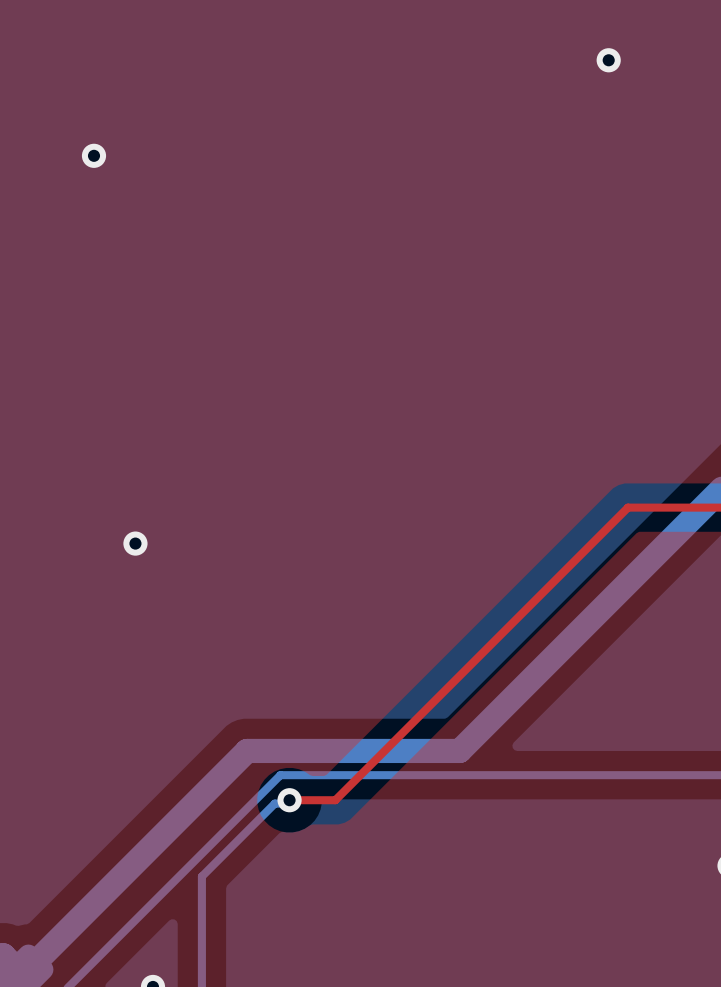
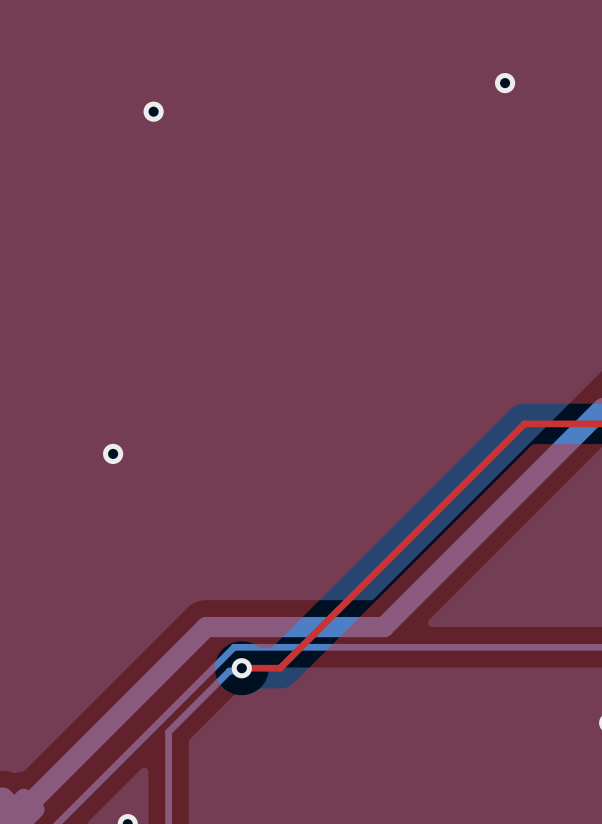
via position: (608, 60) -> (505, 83)
via position: (94, 155) -> (153, 111)

